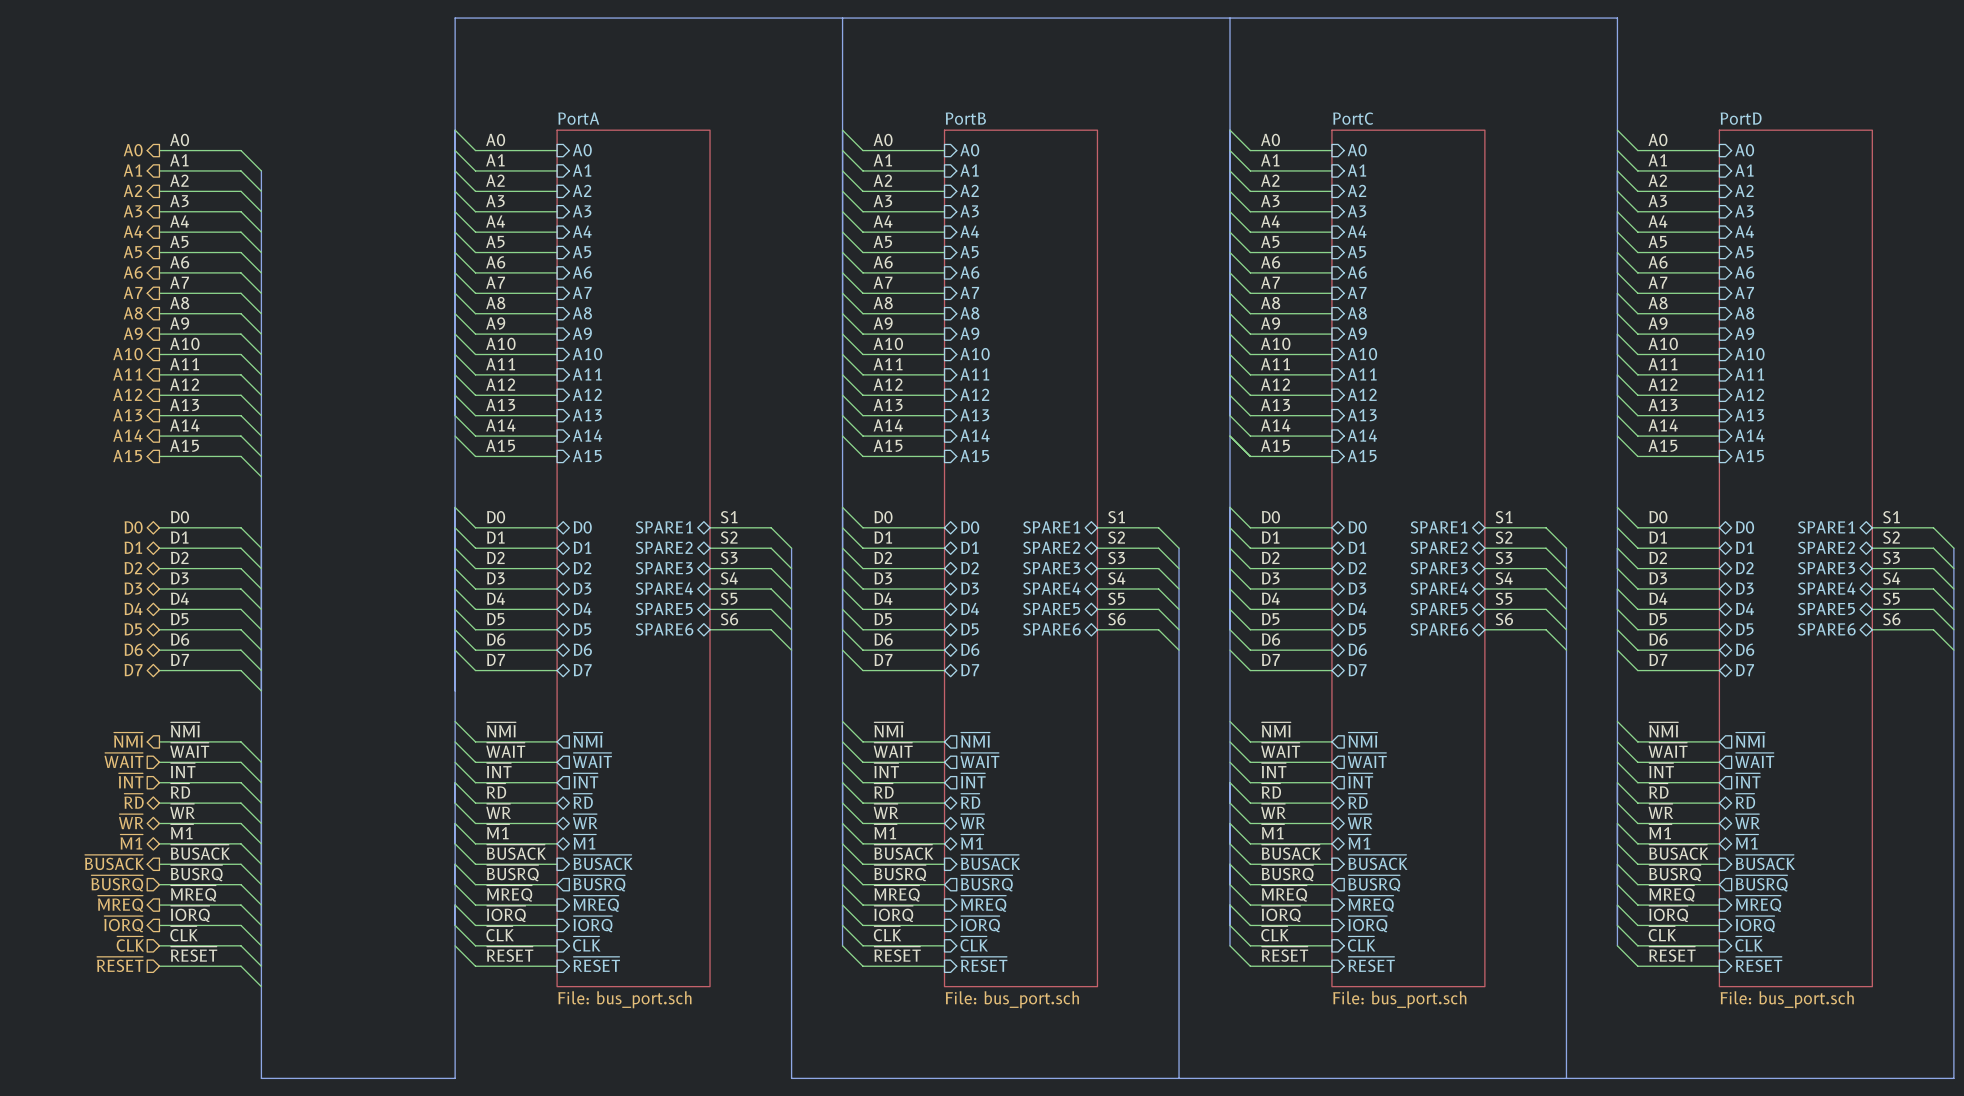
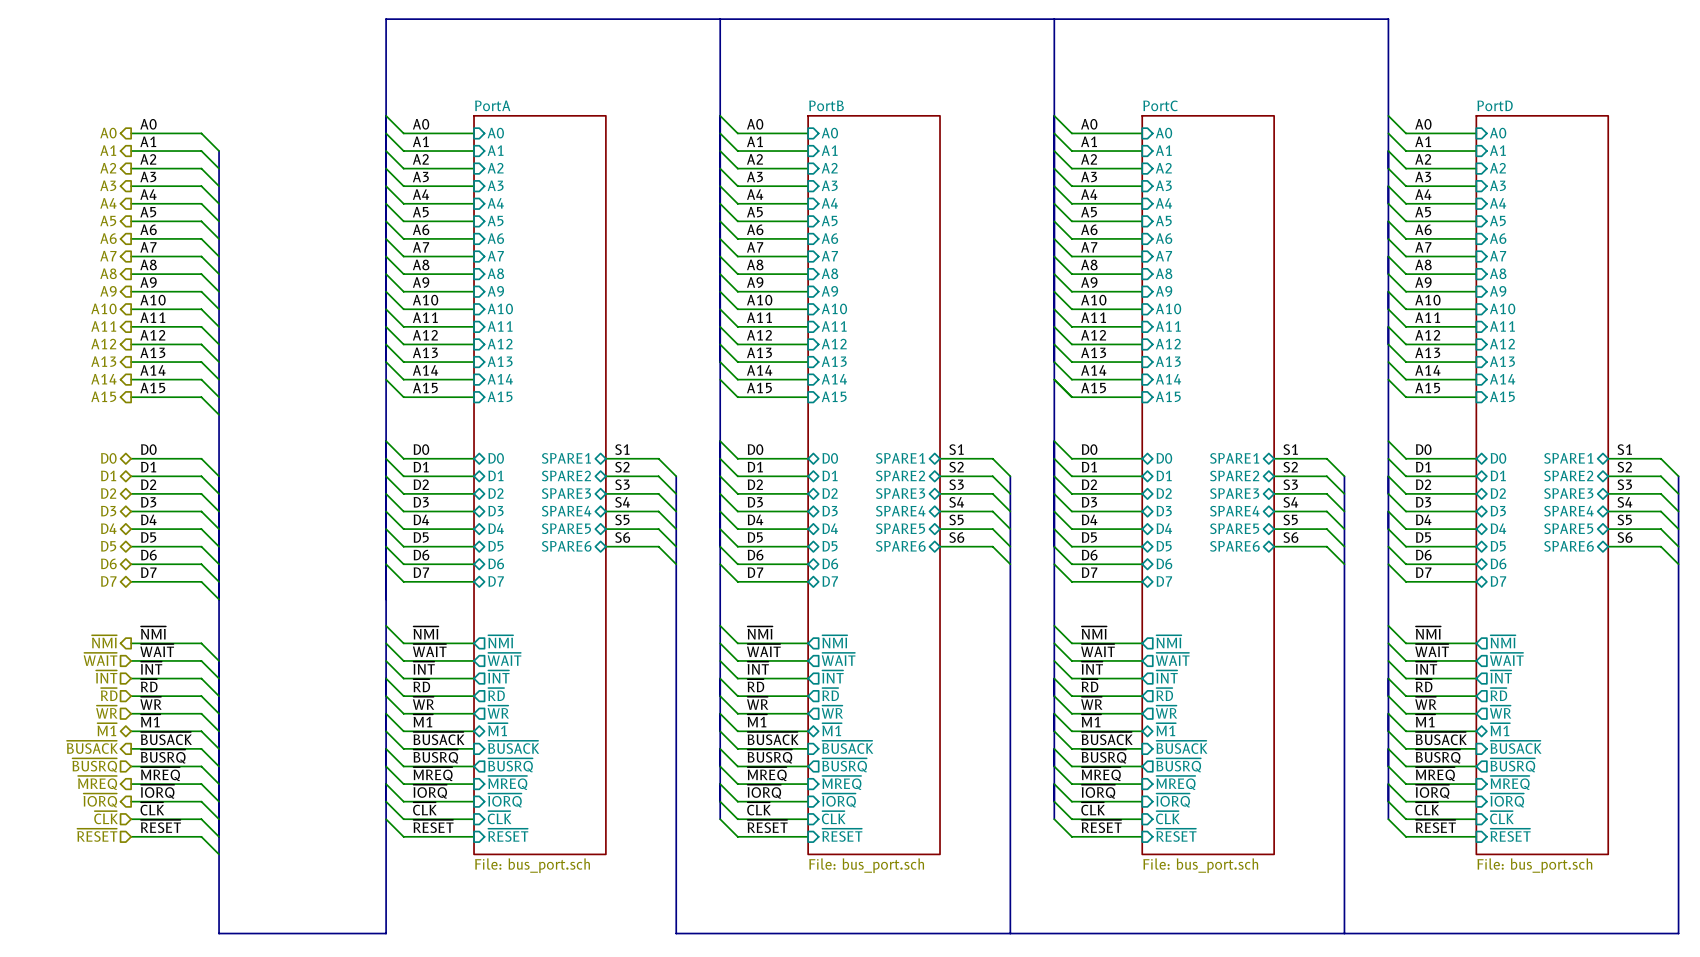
hierarchical label shape: bidirectional (134, 801) -> input (109, 694)
sheet pin shape: bidirectional (583, 801) -> output (496, 694)
sheet pin shape: bidirectional (970, 801) -> output (830, 694)
sheet pin shape: bidirectional (1358, 801) -> output (1164, 694)
sheet pin shape: bidirectional (1745, 801) -> output (1498, 694)
hierarchical label shape: bidirectional (131, 821) -> input (106, 712)
sheet pin shape: bidirectional (585, 821) -> output (498, 712)
sheet pin shape: bidirectional (972, 821) -> output (832, 712)
sheet pin shape: bidirectional (1360, 821) -> output (1166, 712)
sheet pin shape: bidirectional (1747, 821) -> output (1500, 712)

